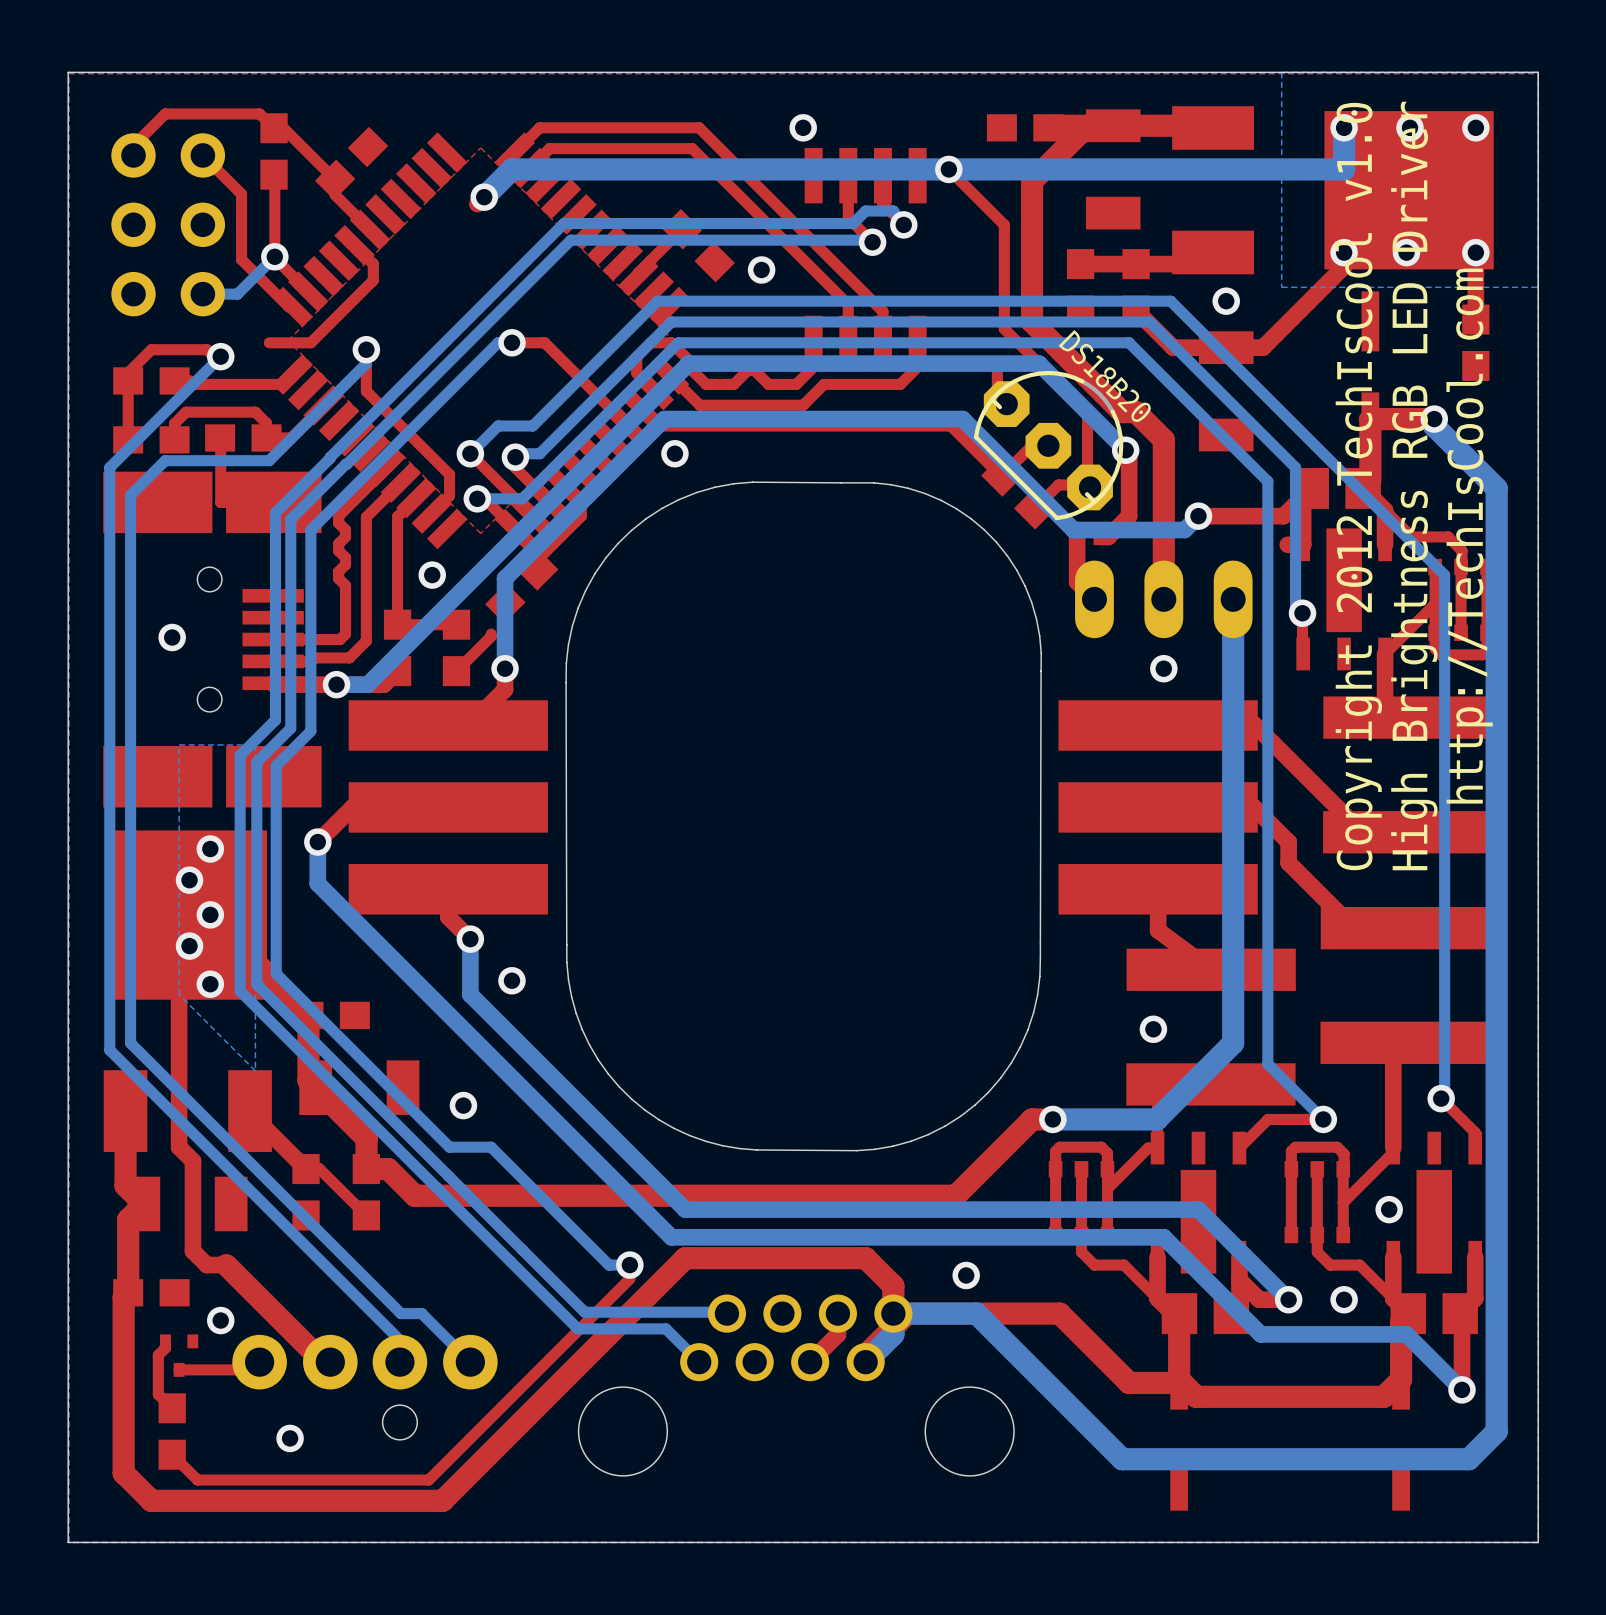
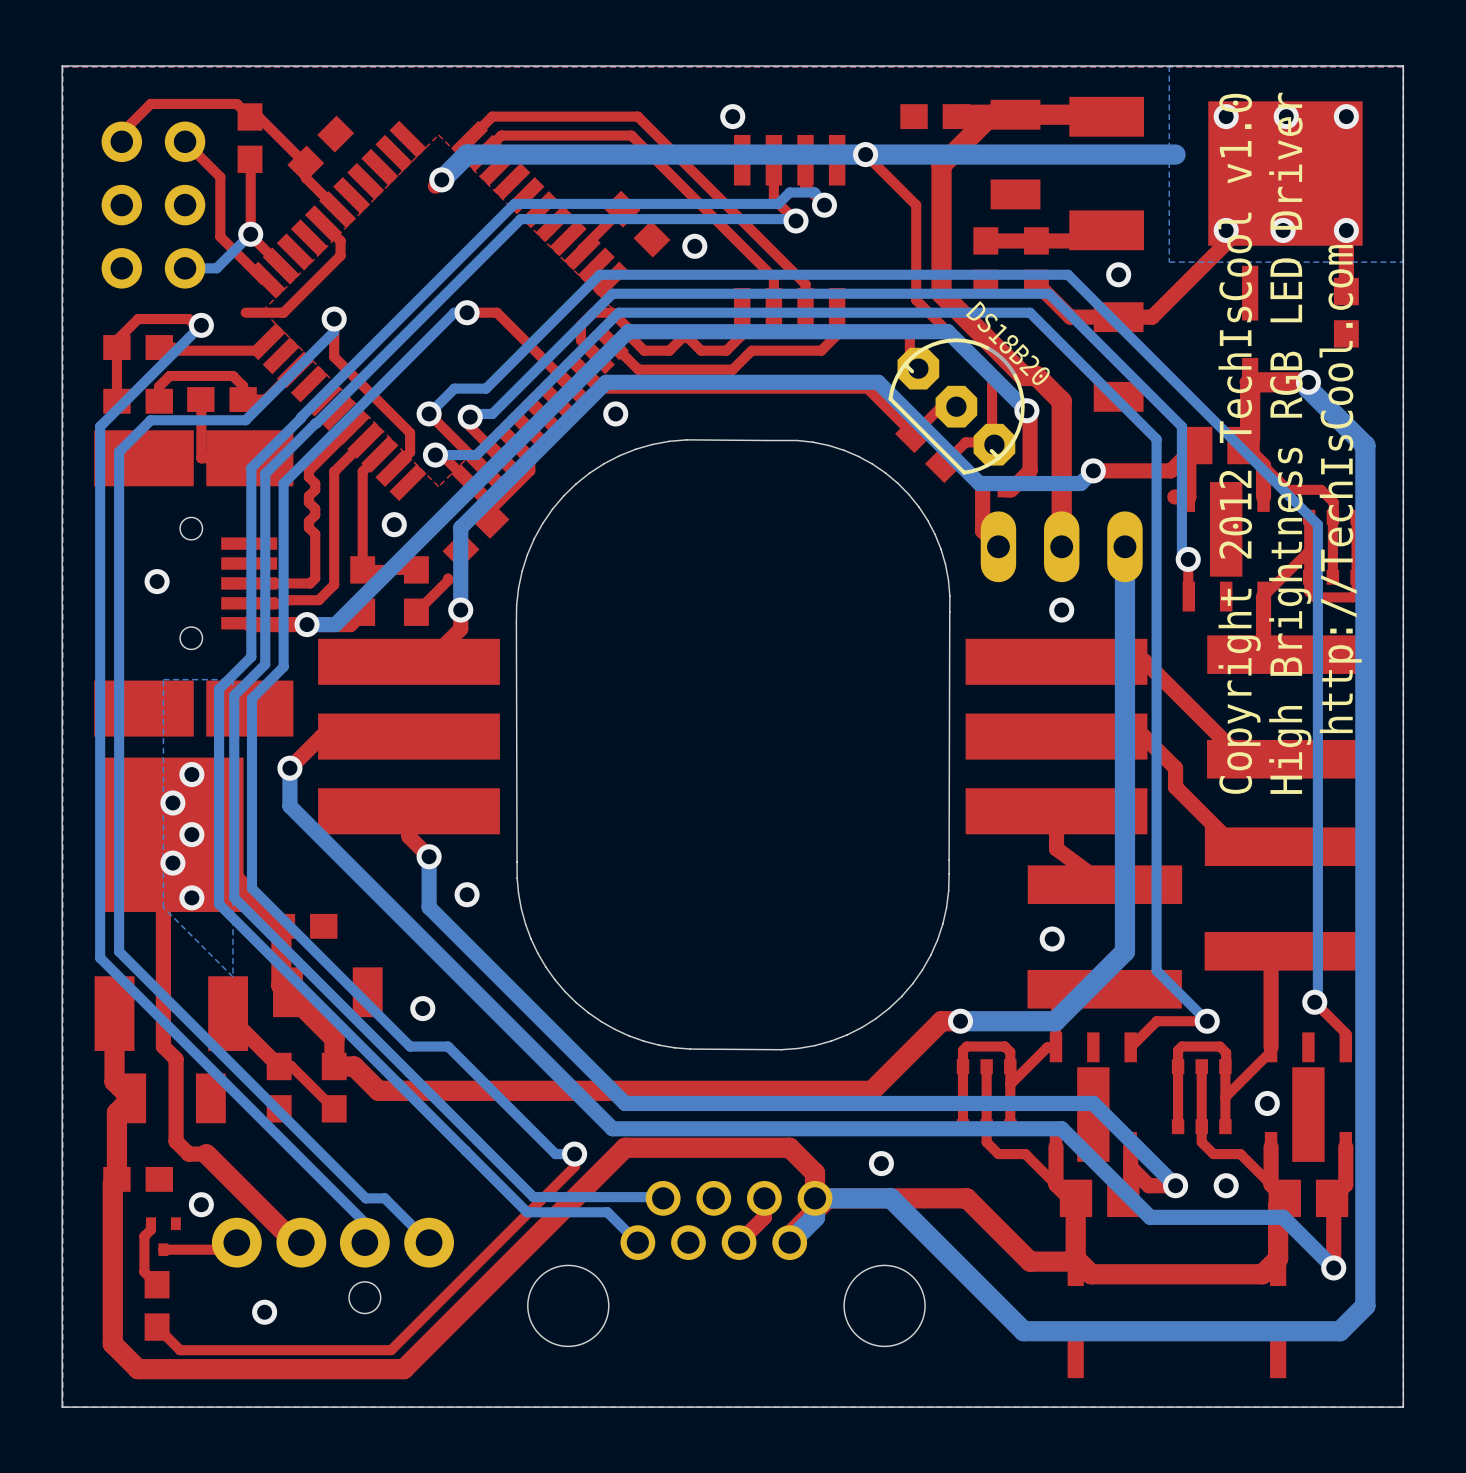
bottom track: (1344, 127) (1344, 169) (1288, 169) -> none

